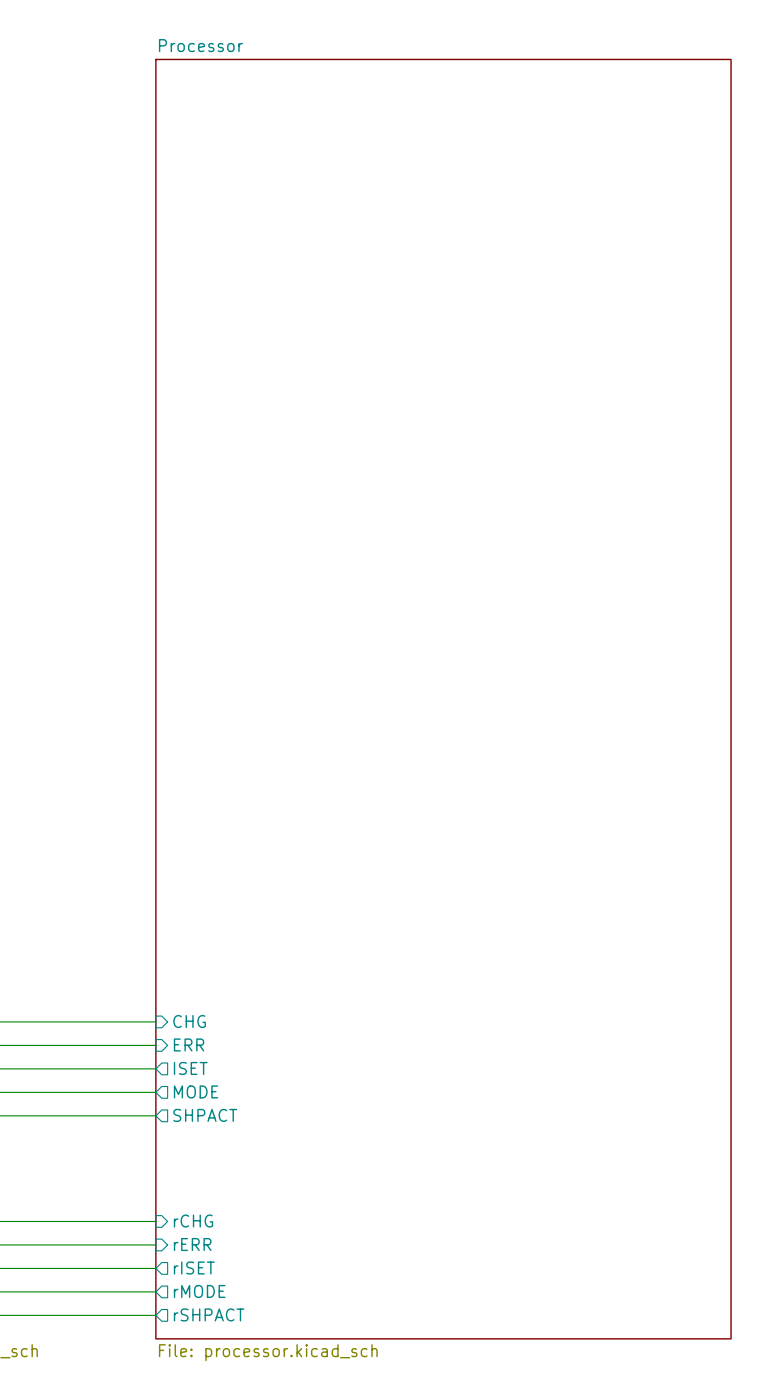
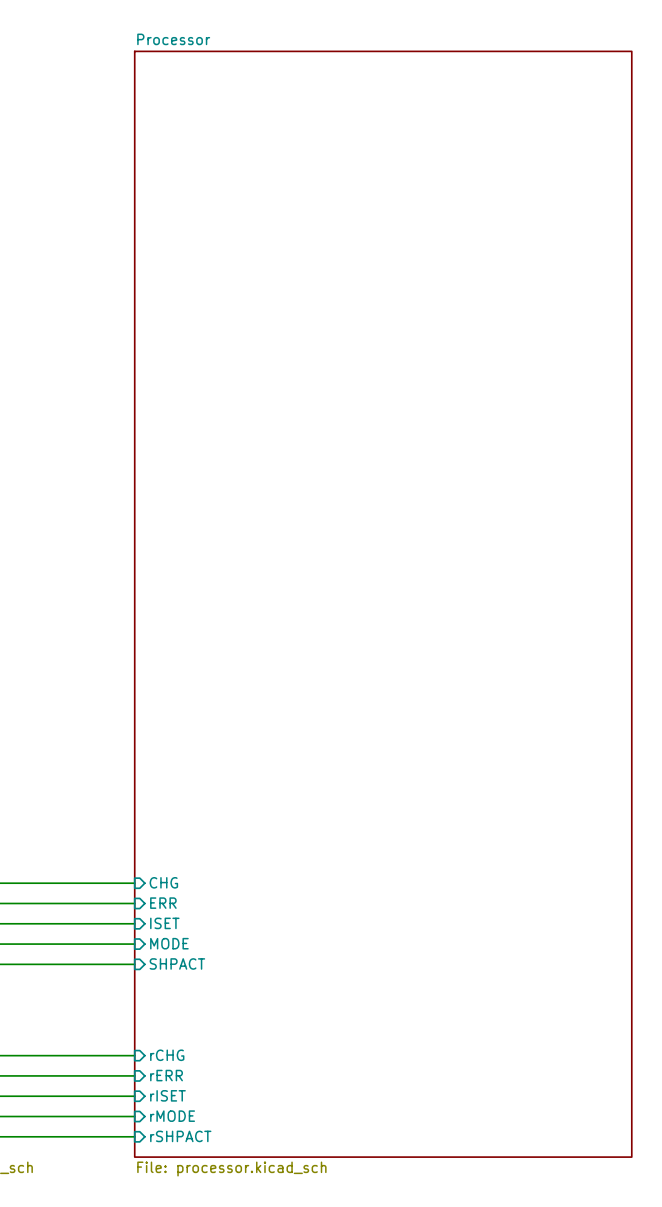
sheet pin shape: output (190, 1068) -> input (164, 923)
sheet pin shape: output (196, 1091) -> input (169, 943)
sheet pin shape: output (205, 1115) -> input (177, 963)
sheet pin shape: output (194, 1267) -> input (167, 1095)
sheet pin shape: output (199, 1291) -> input (172, 1116)
sheet pin shape: output (209, 1314) -> input (180, 1136)

